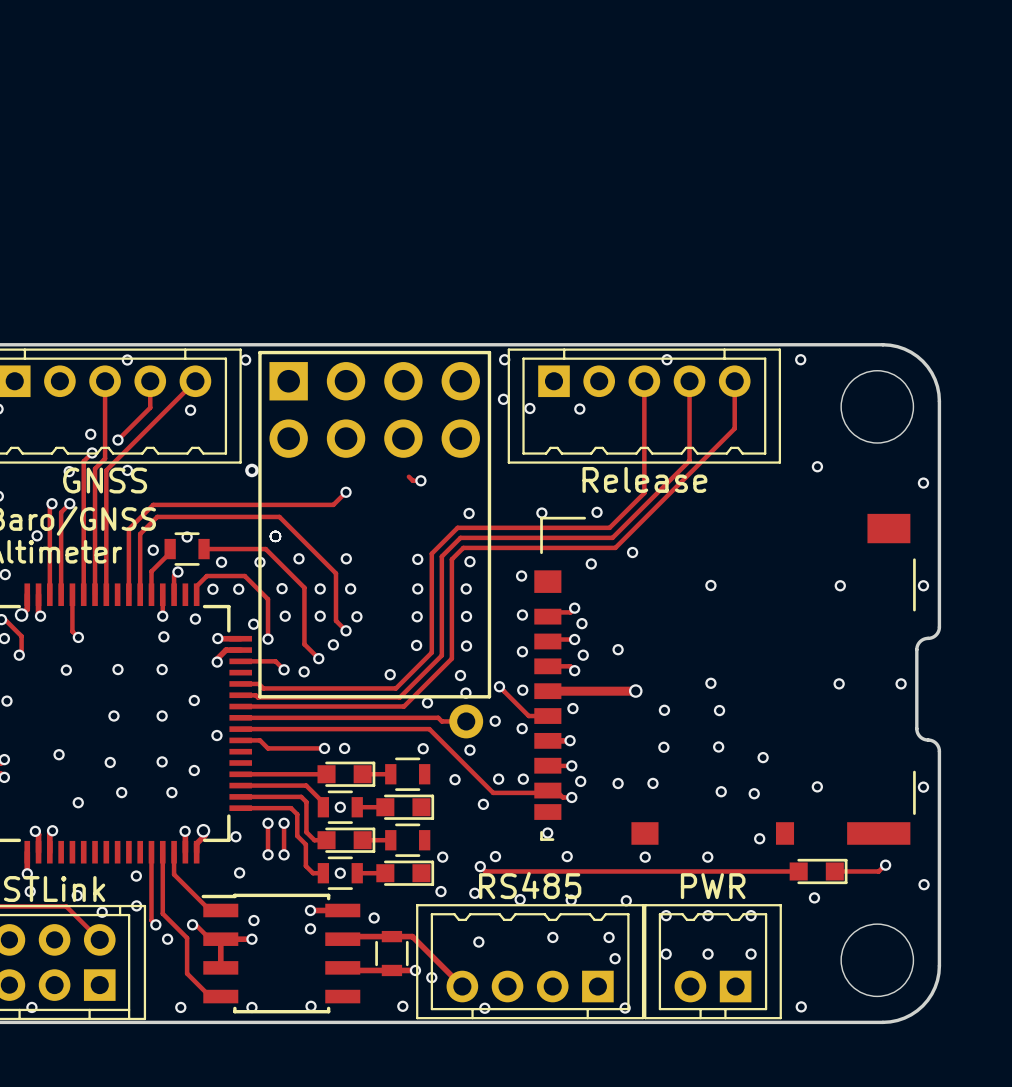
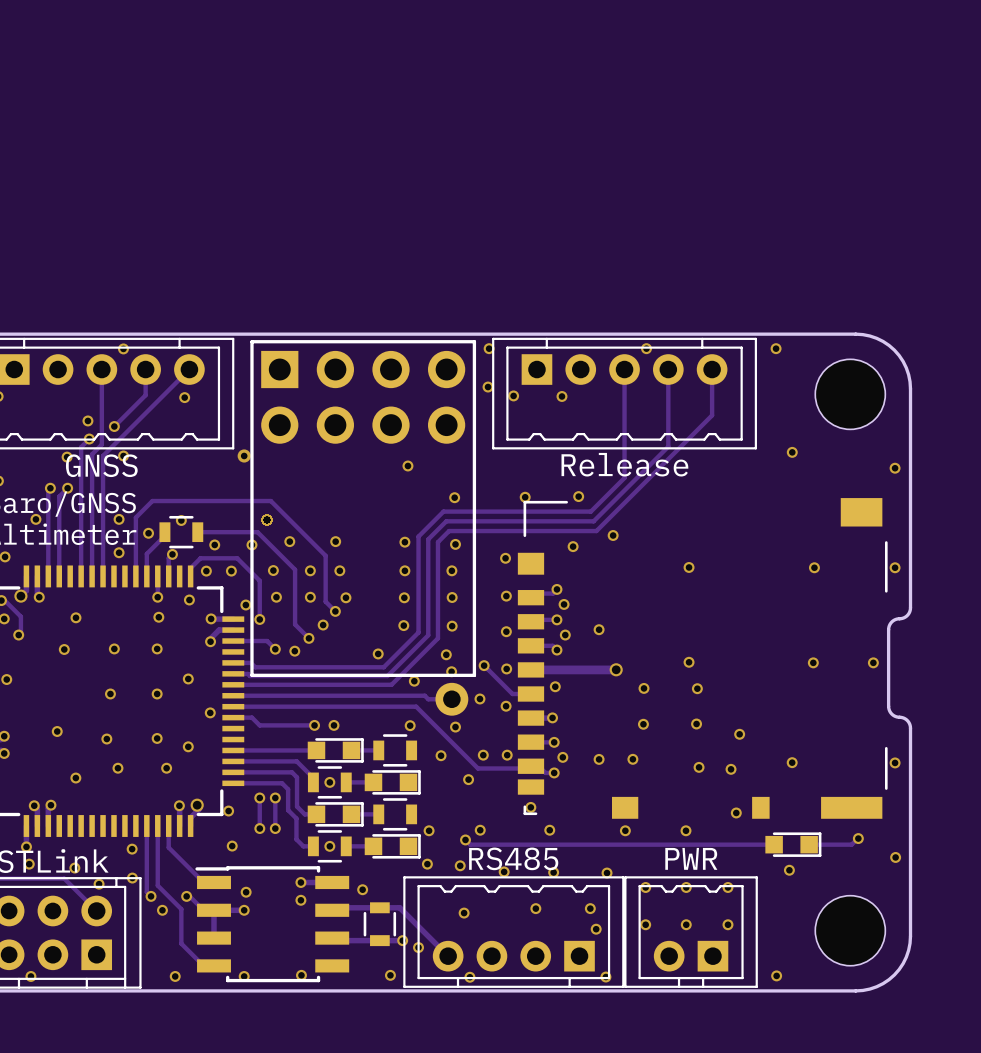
via: (245, 360) -> none
track: (408, 476) (412, 480) (420, 480) -> none
track: (346, 492) (333, 504) (153, 504) (128, 529) (128, 594) -> none
via: (346, 492) -> none
via: none -> (119, 519)
via: none -> (119, 552)
track: (72, 594) (72, 631) (78, 637) -> none

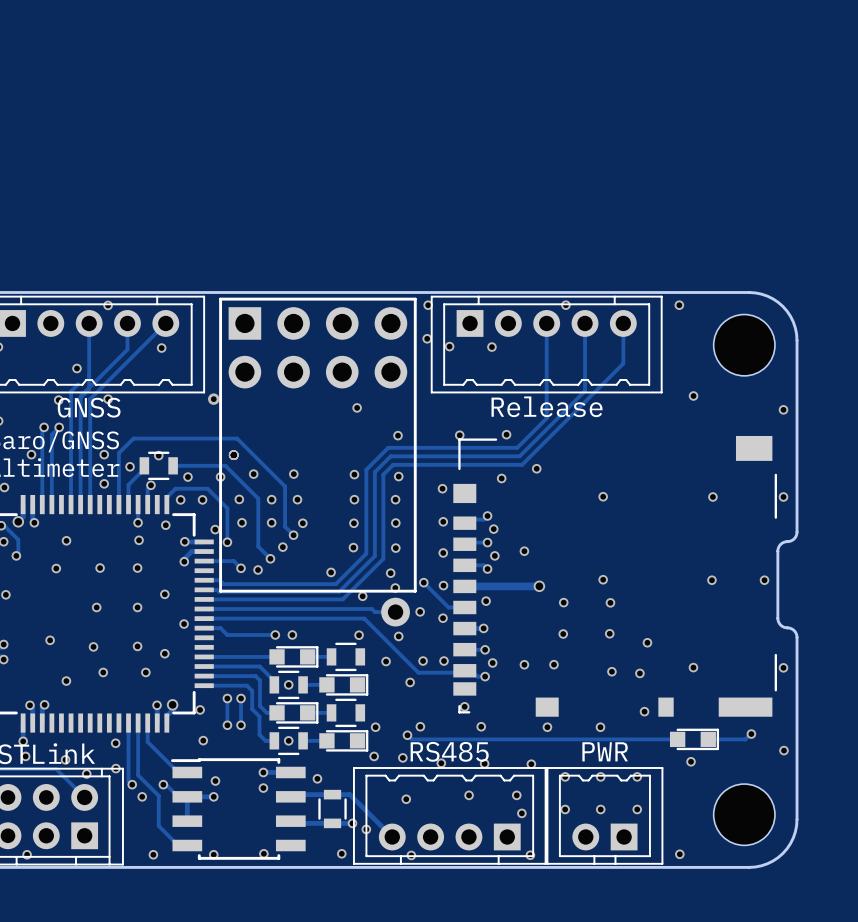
track: (145, 395) (114, 426) -> (127, 345) (127, 349) (80, 397)
via: (114, 426) -> none
via: (89, 439) -> none

